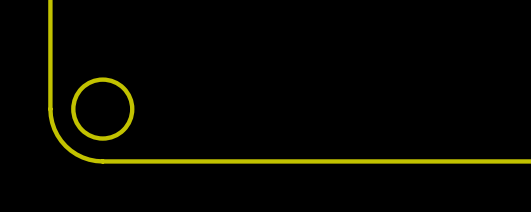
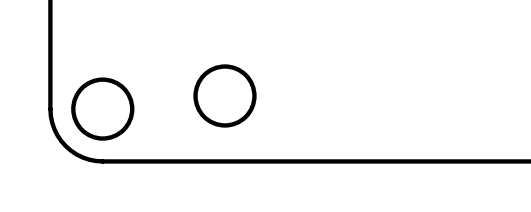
round board edge: none -> [193, 64, 257, 128]

